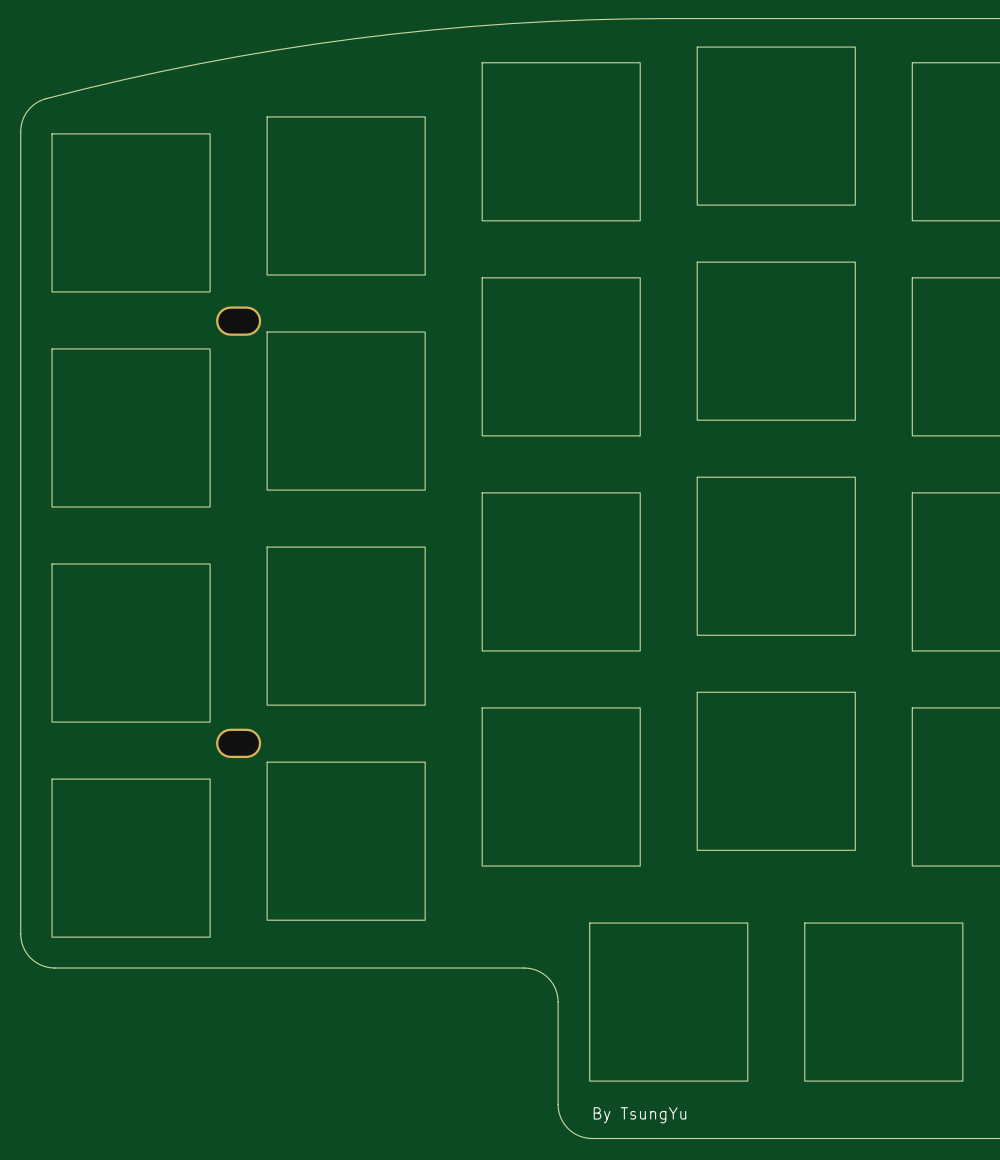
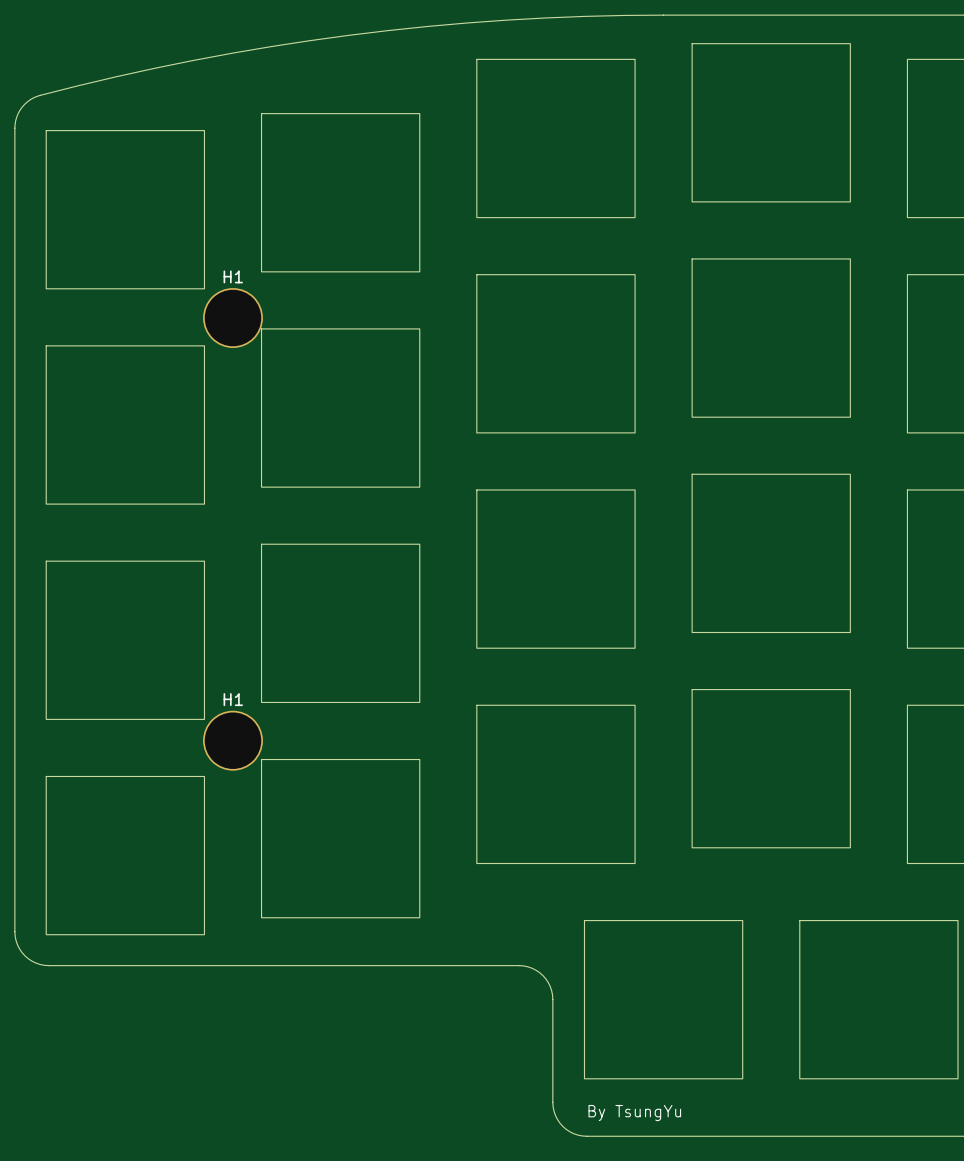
part: (238, 321) -> none
H1: none -> (232, 318)
H1: none -> (232, 740)

